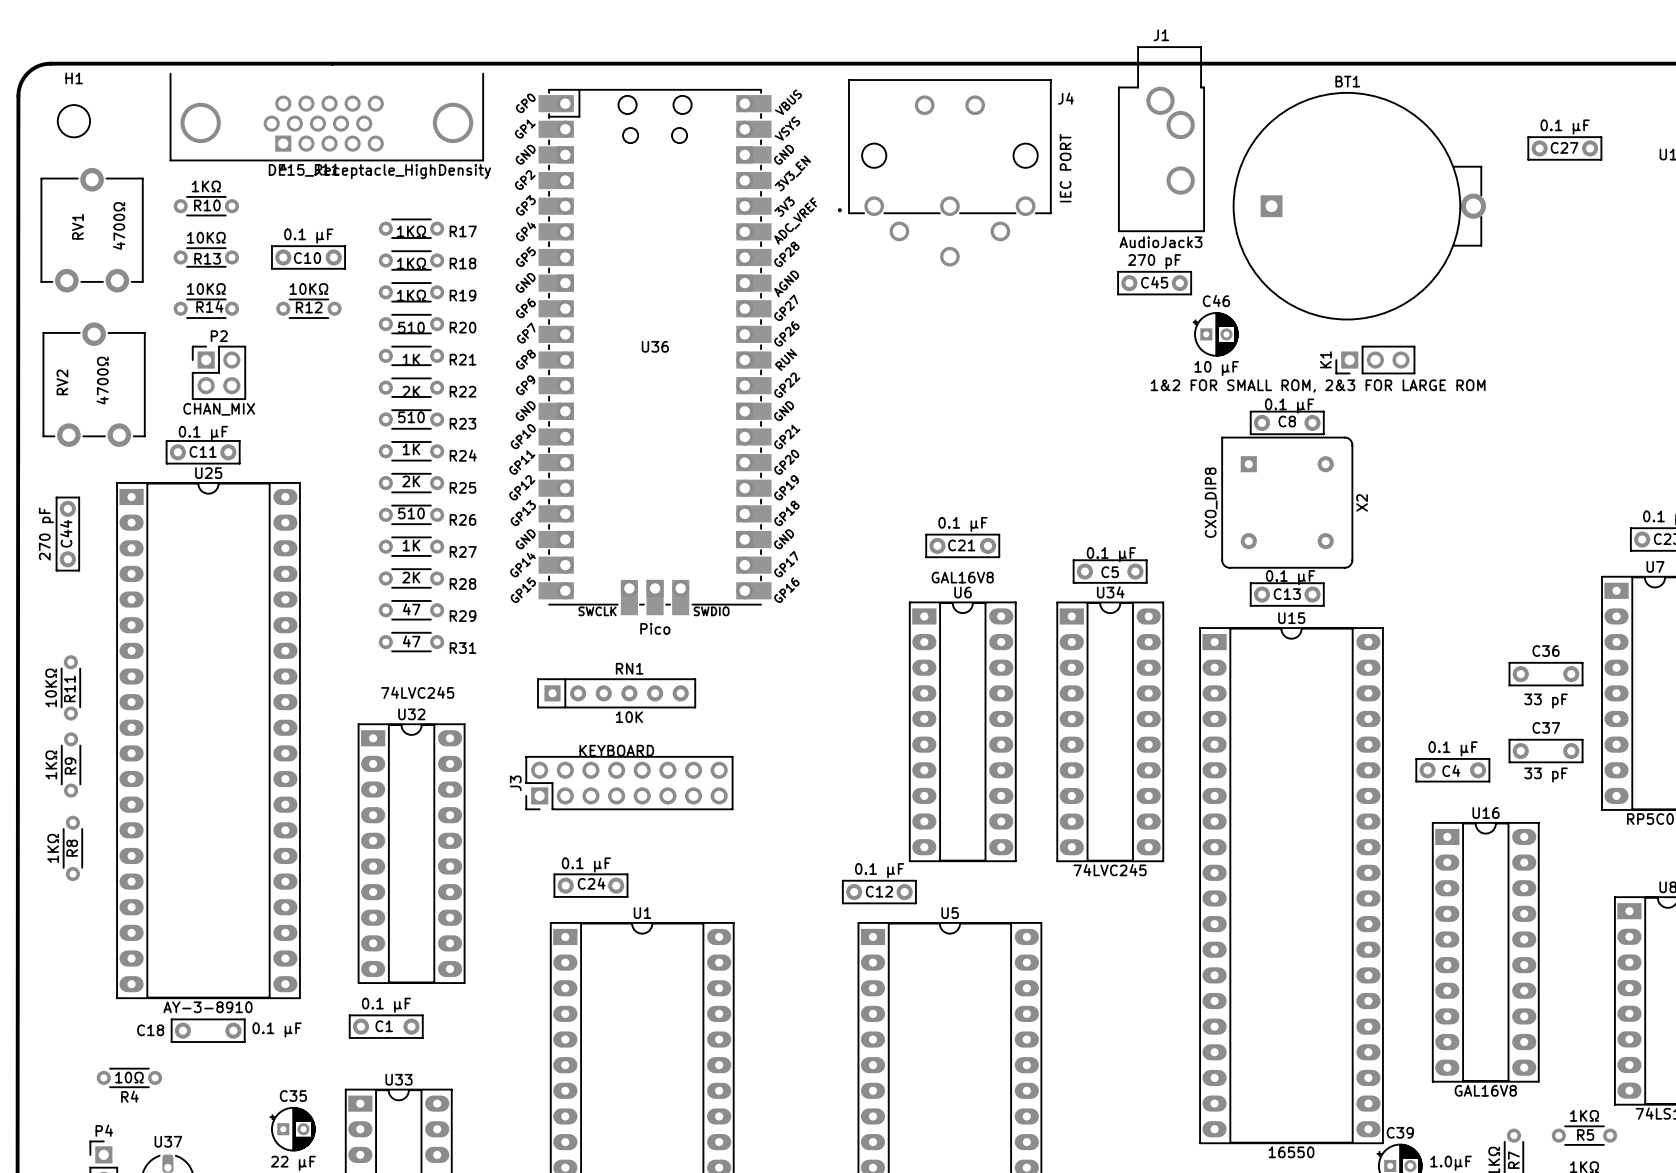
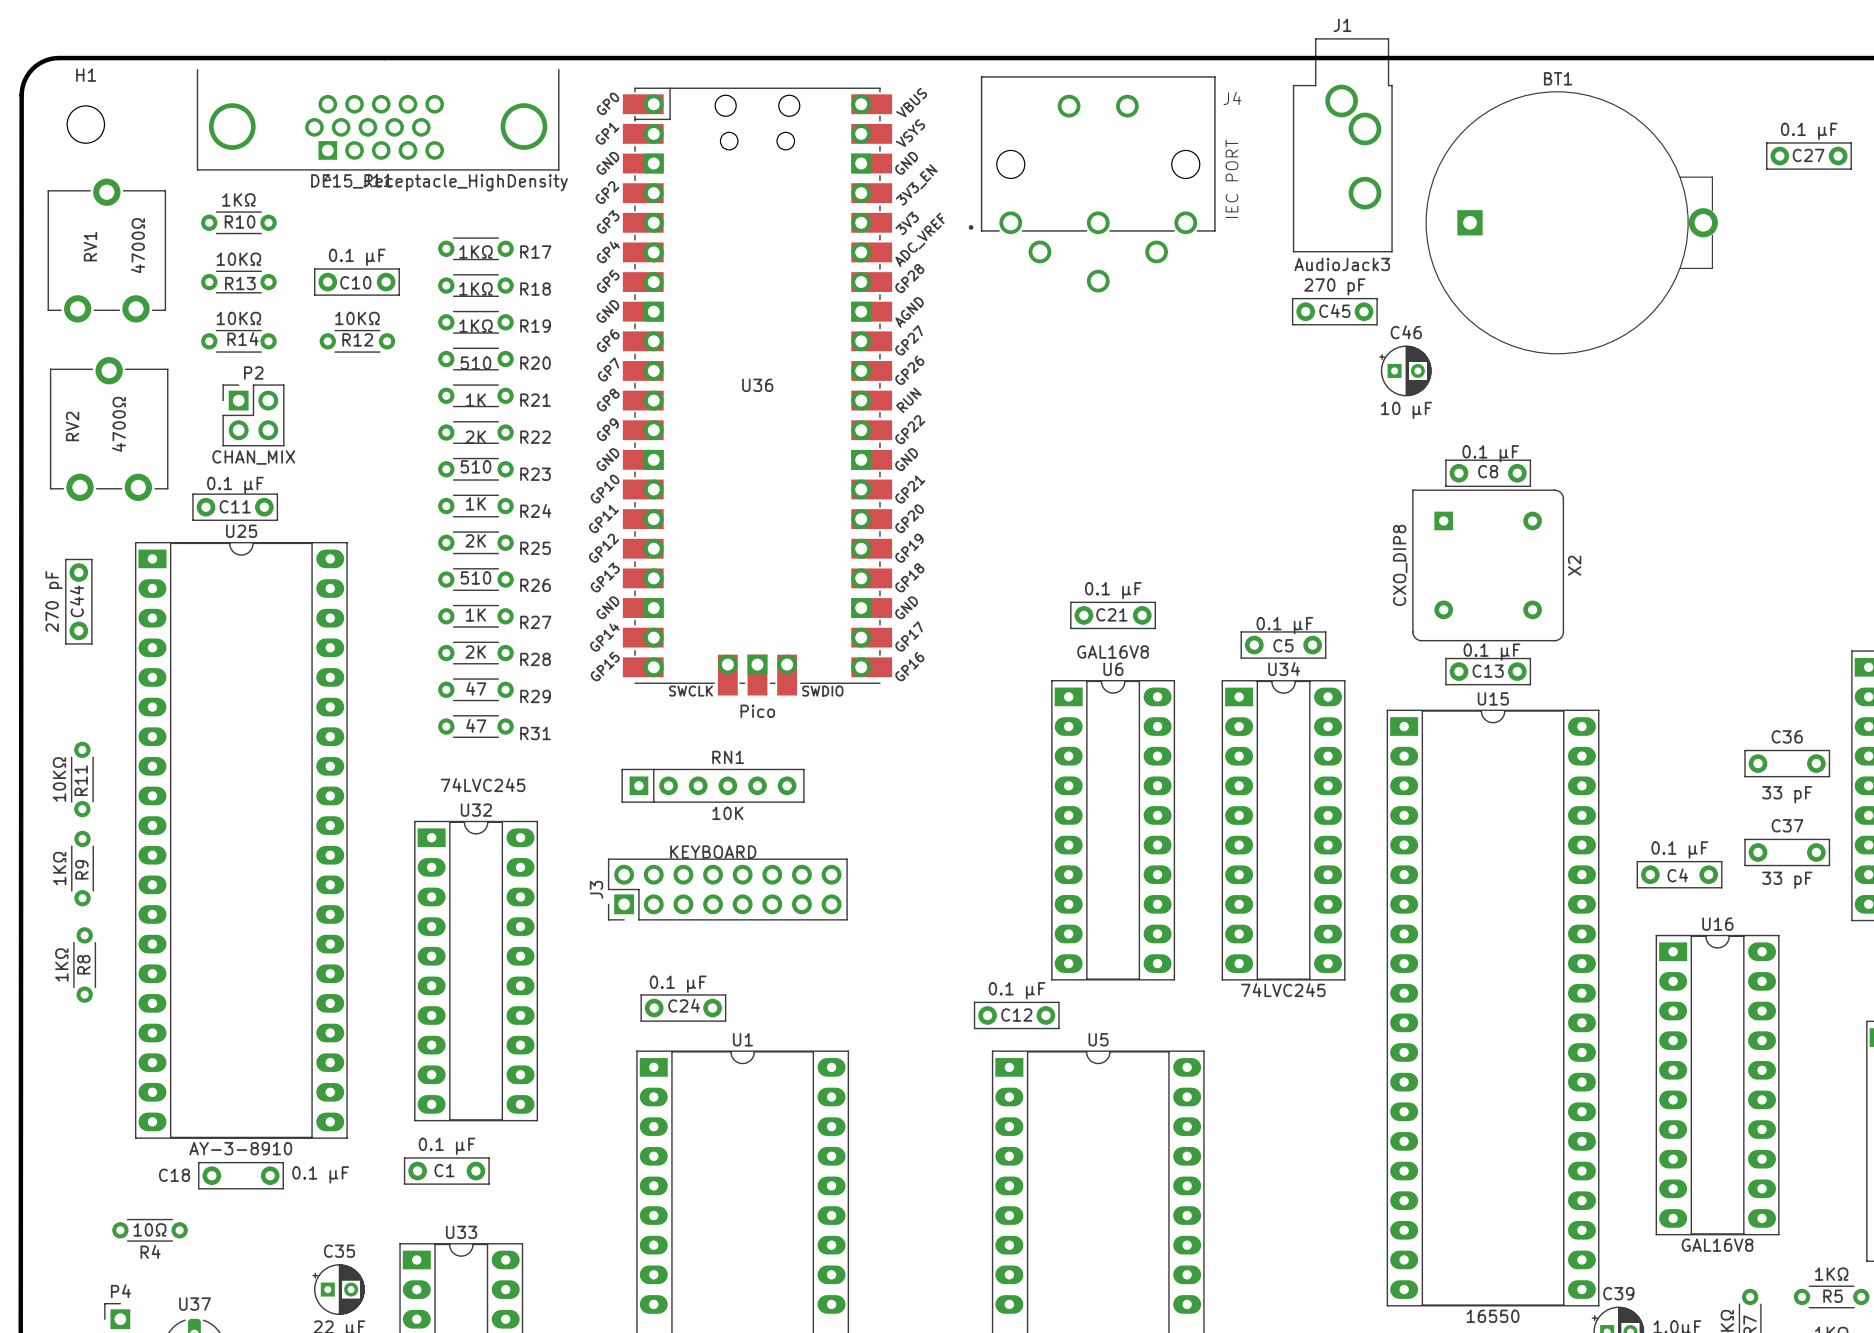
K1: 1&2 FOR SMALL ROM, 2&3 FOR LARGE ROM (1375, 360) -> none

